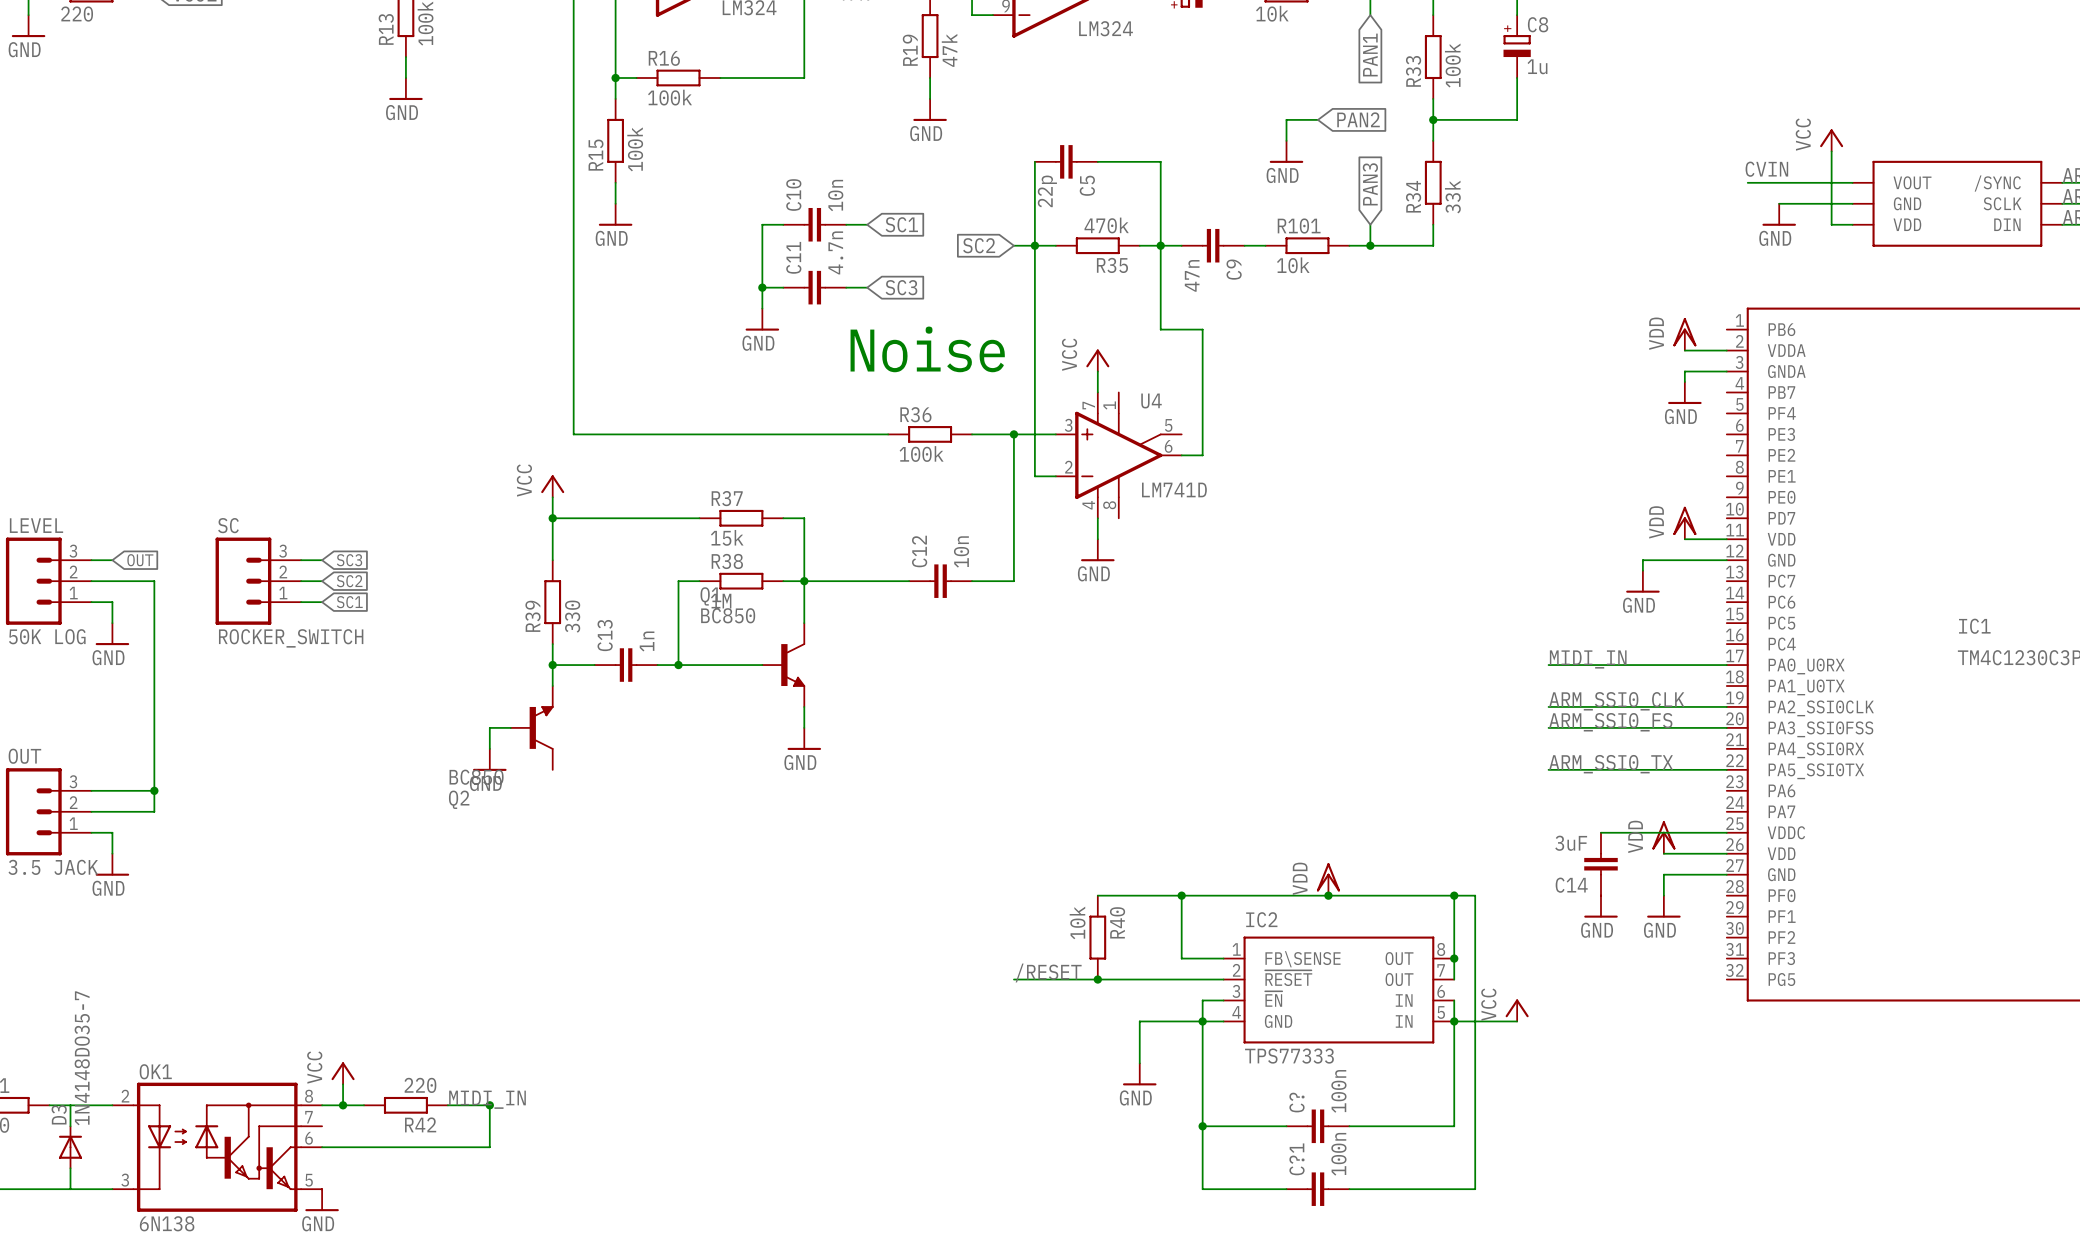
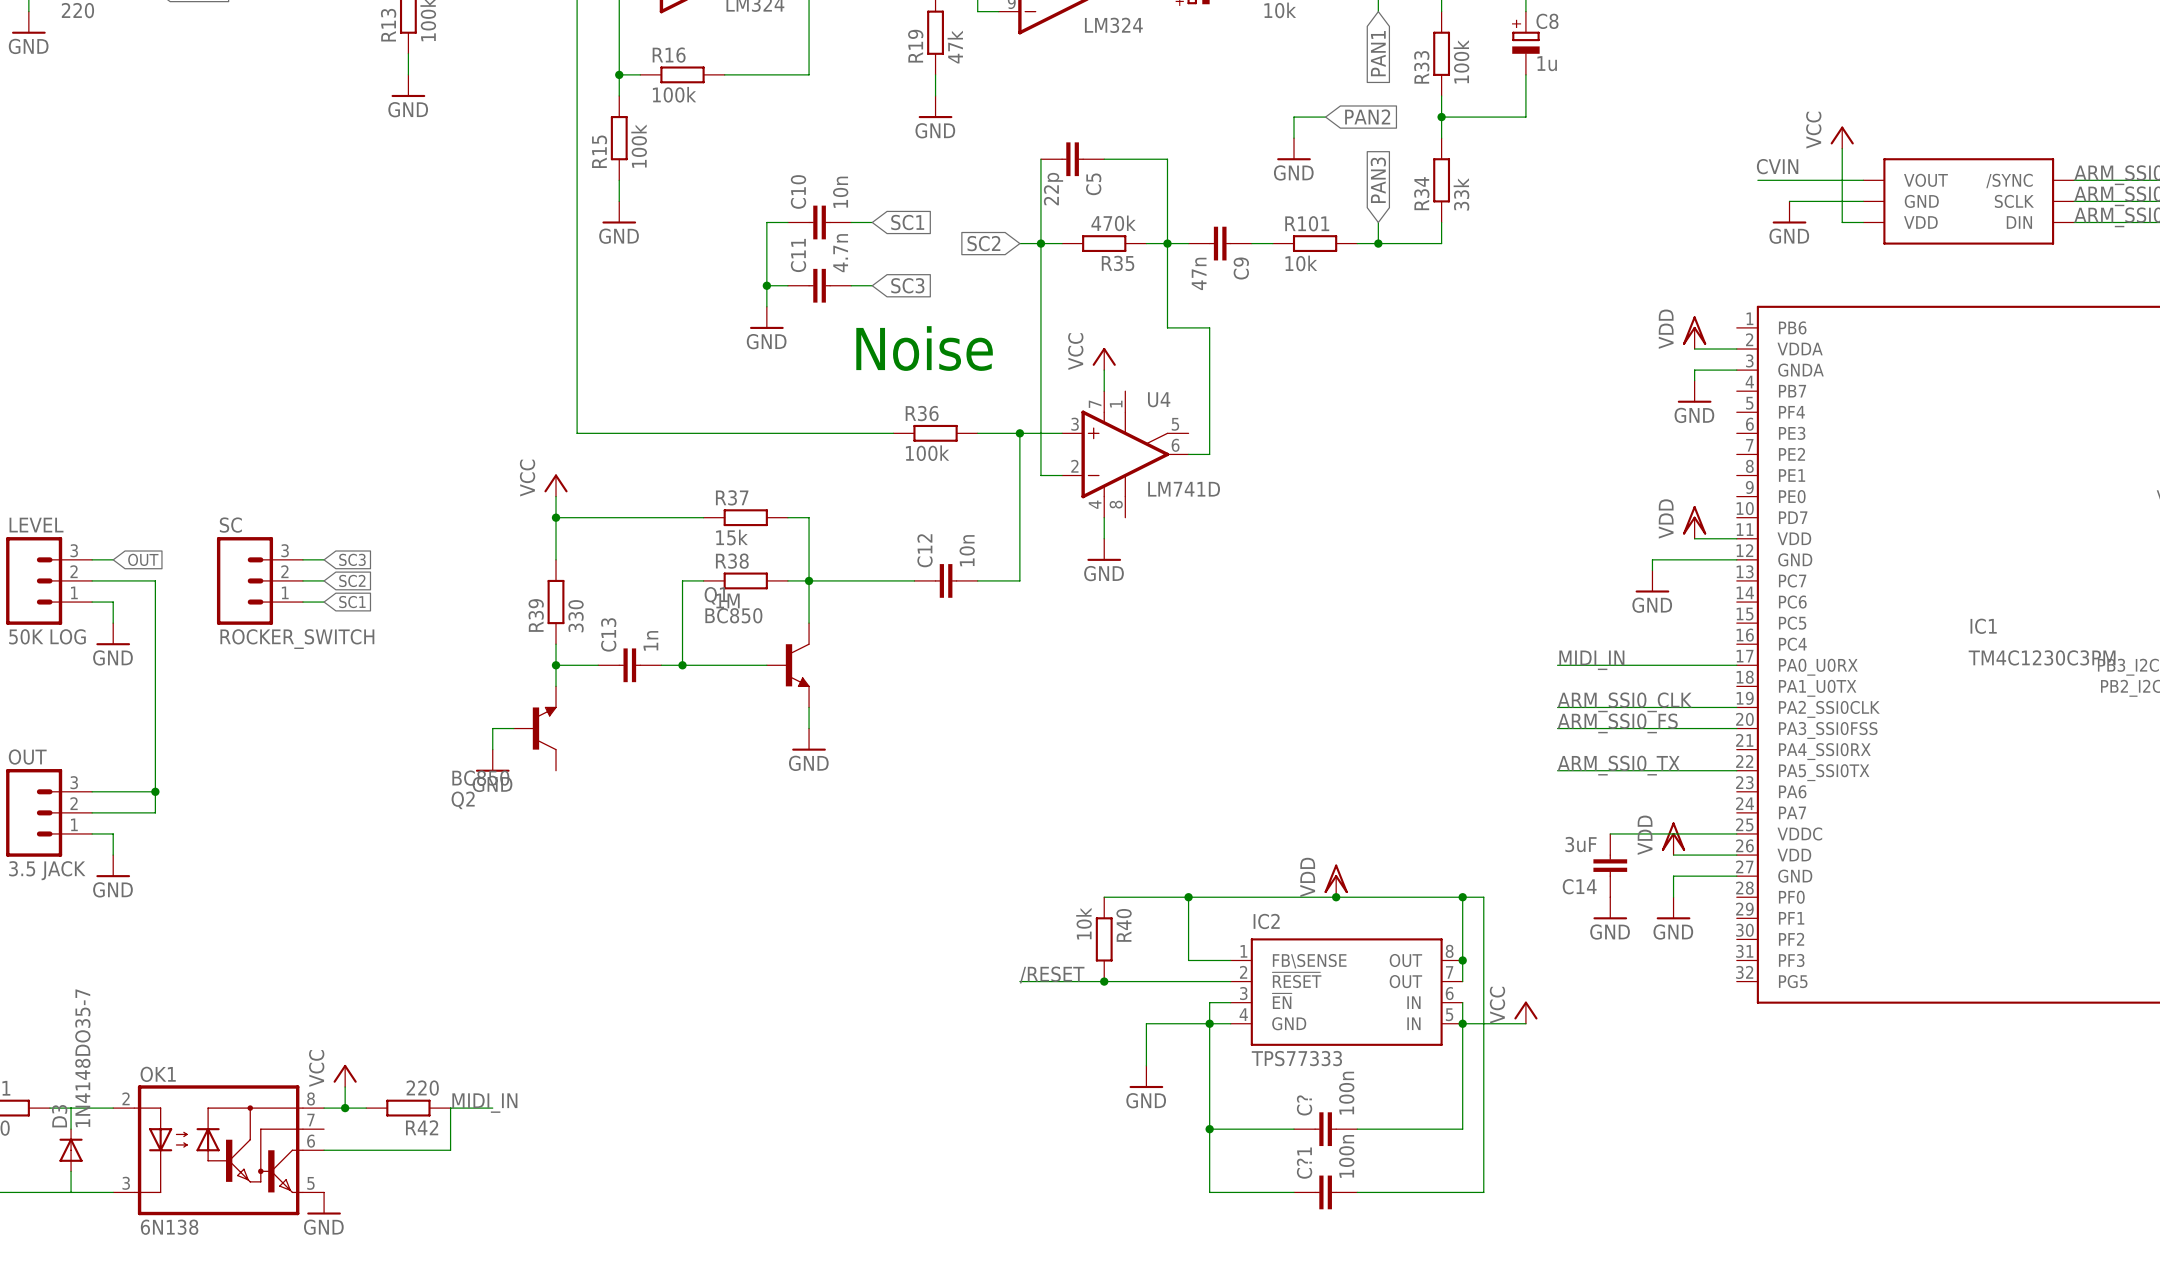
wire: (489, 1105) (489, 1147) (447, 1147) -> (450, 1108) (450, 1150)
junction: (489, 1105) -> none

